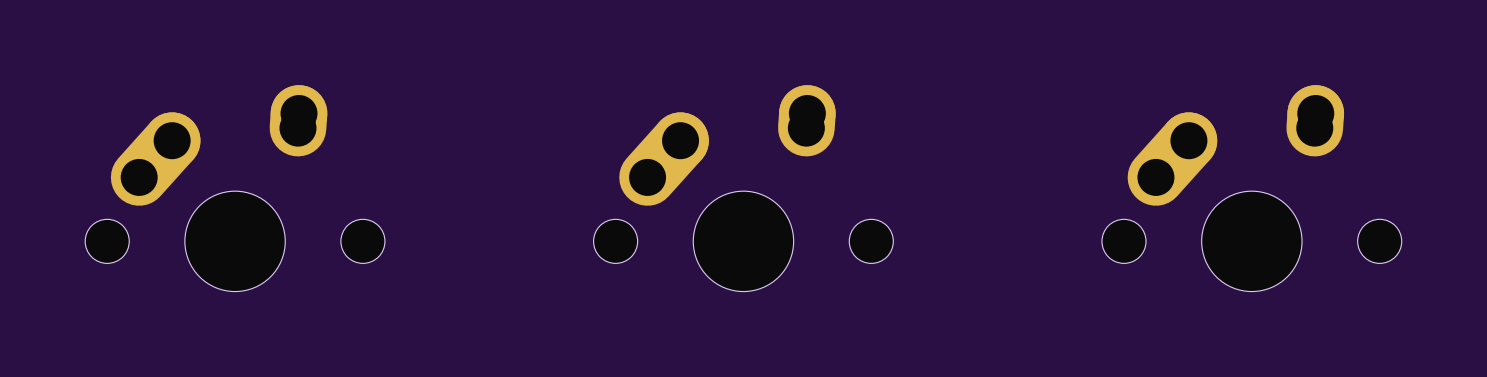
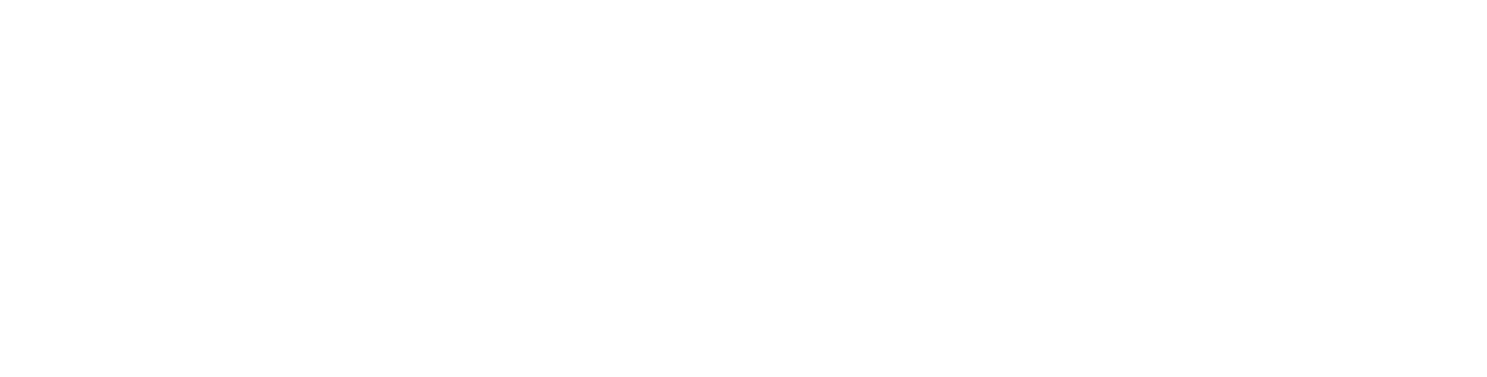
part: (235, 188) -> none
part: (743, 188) -> none
part: (1251, 188) -> none

